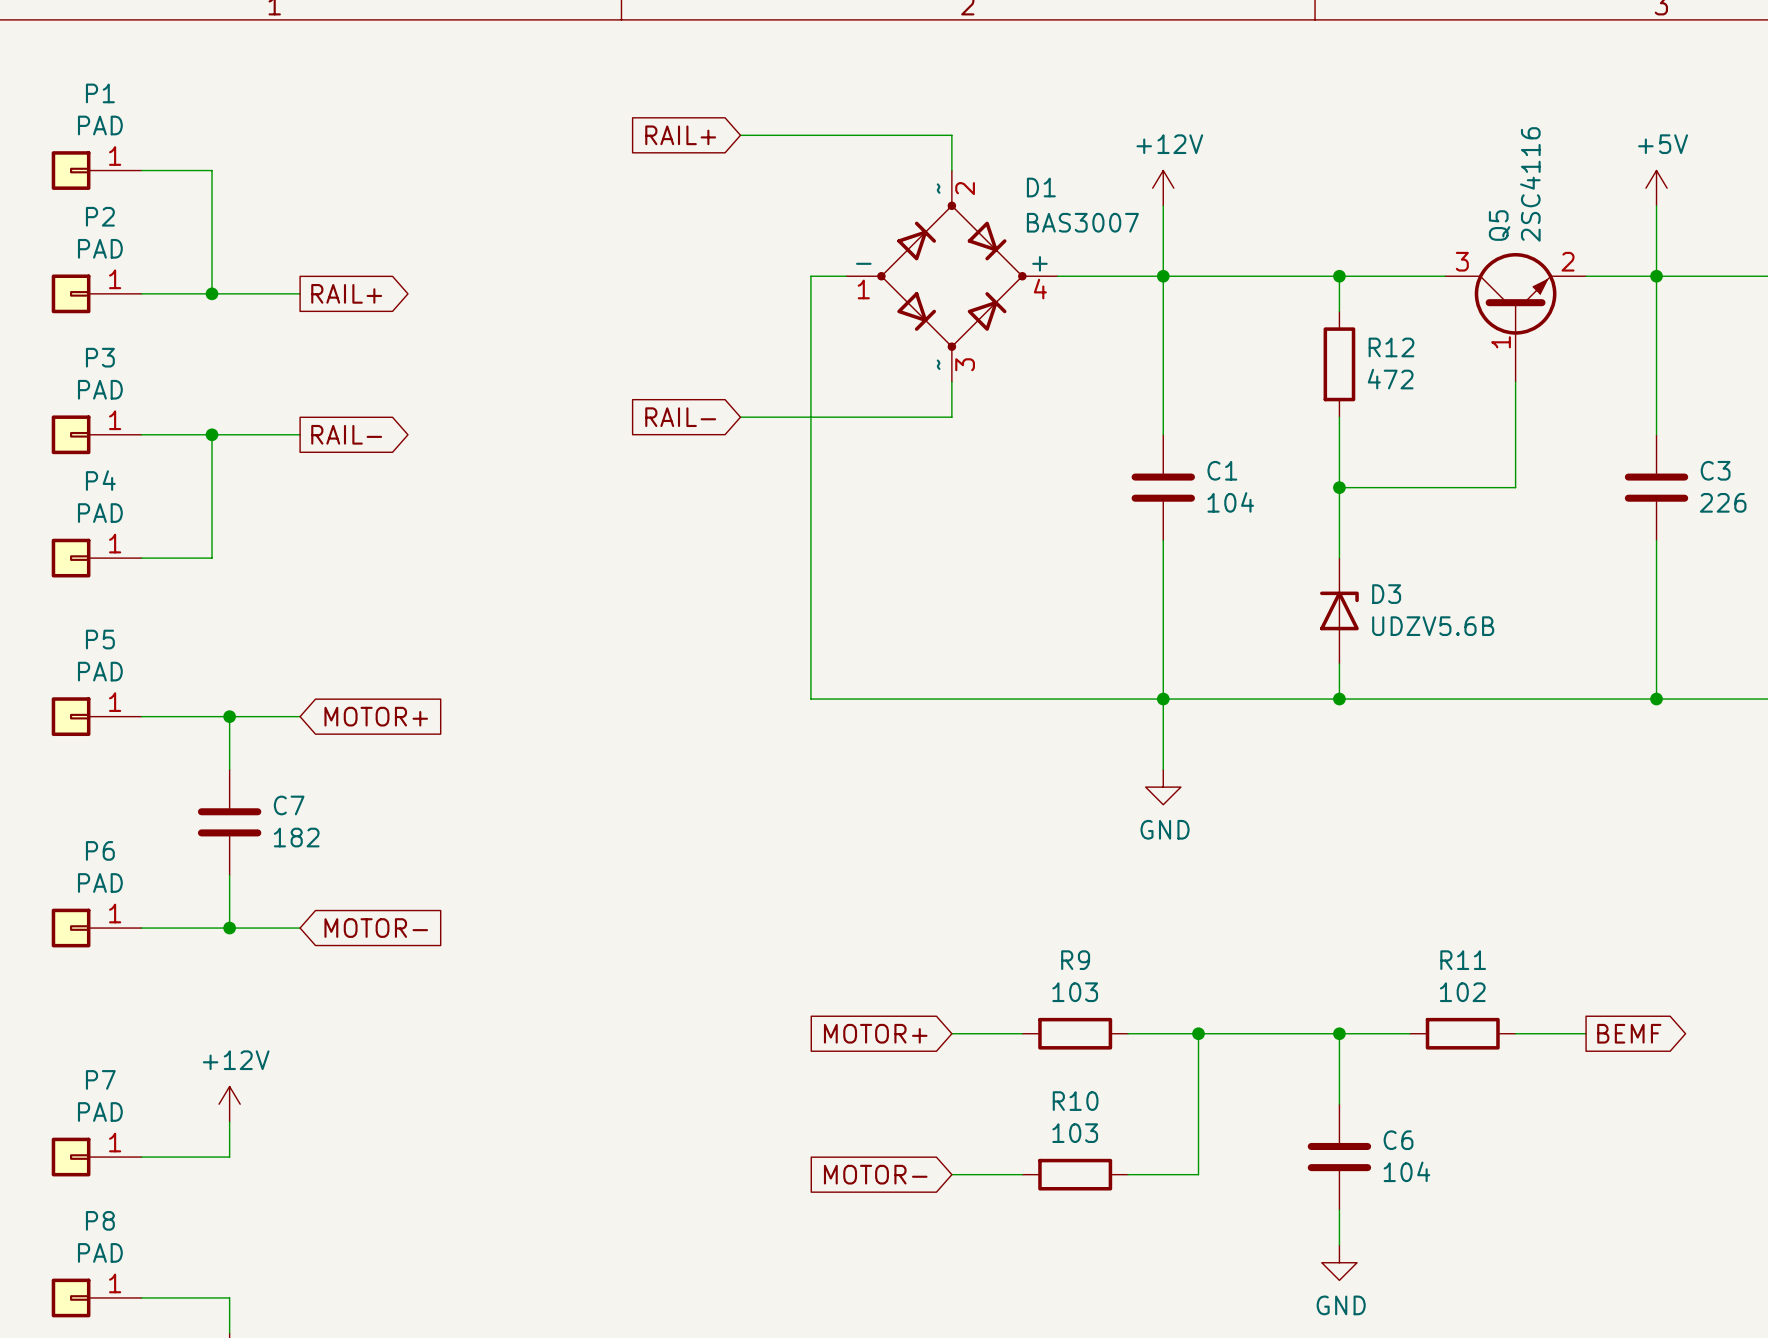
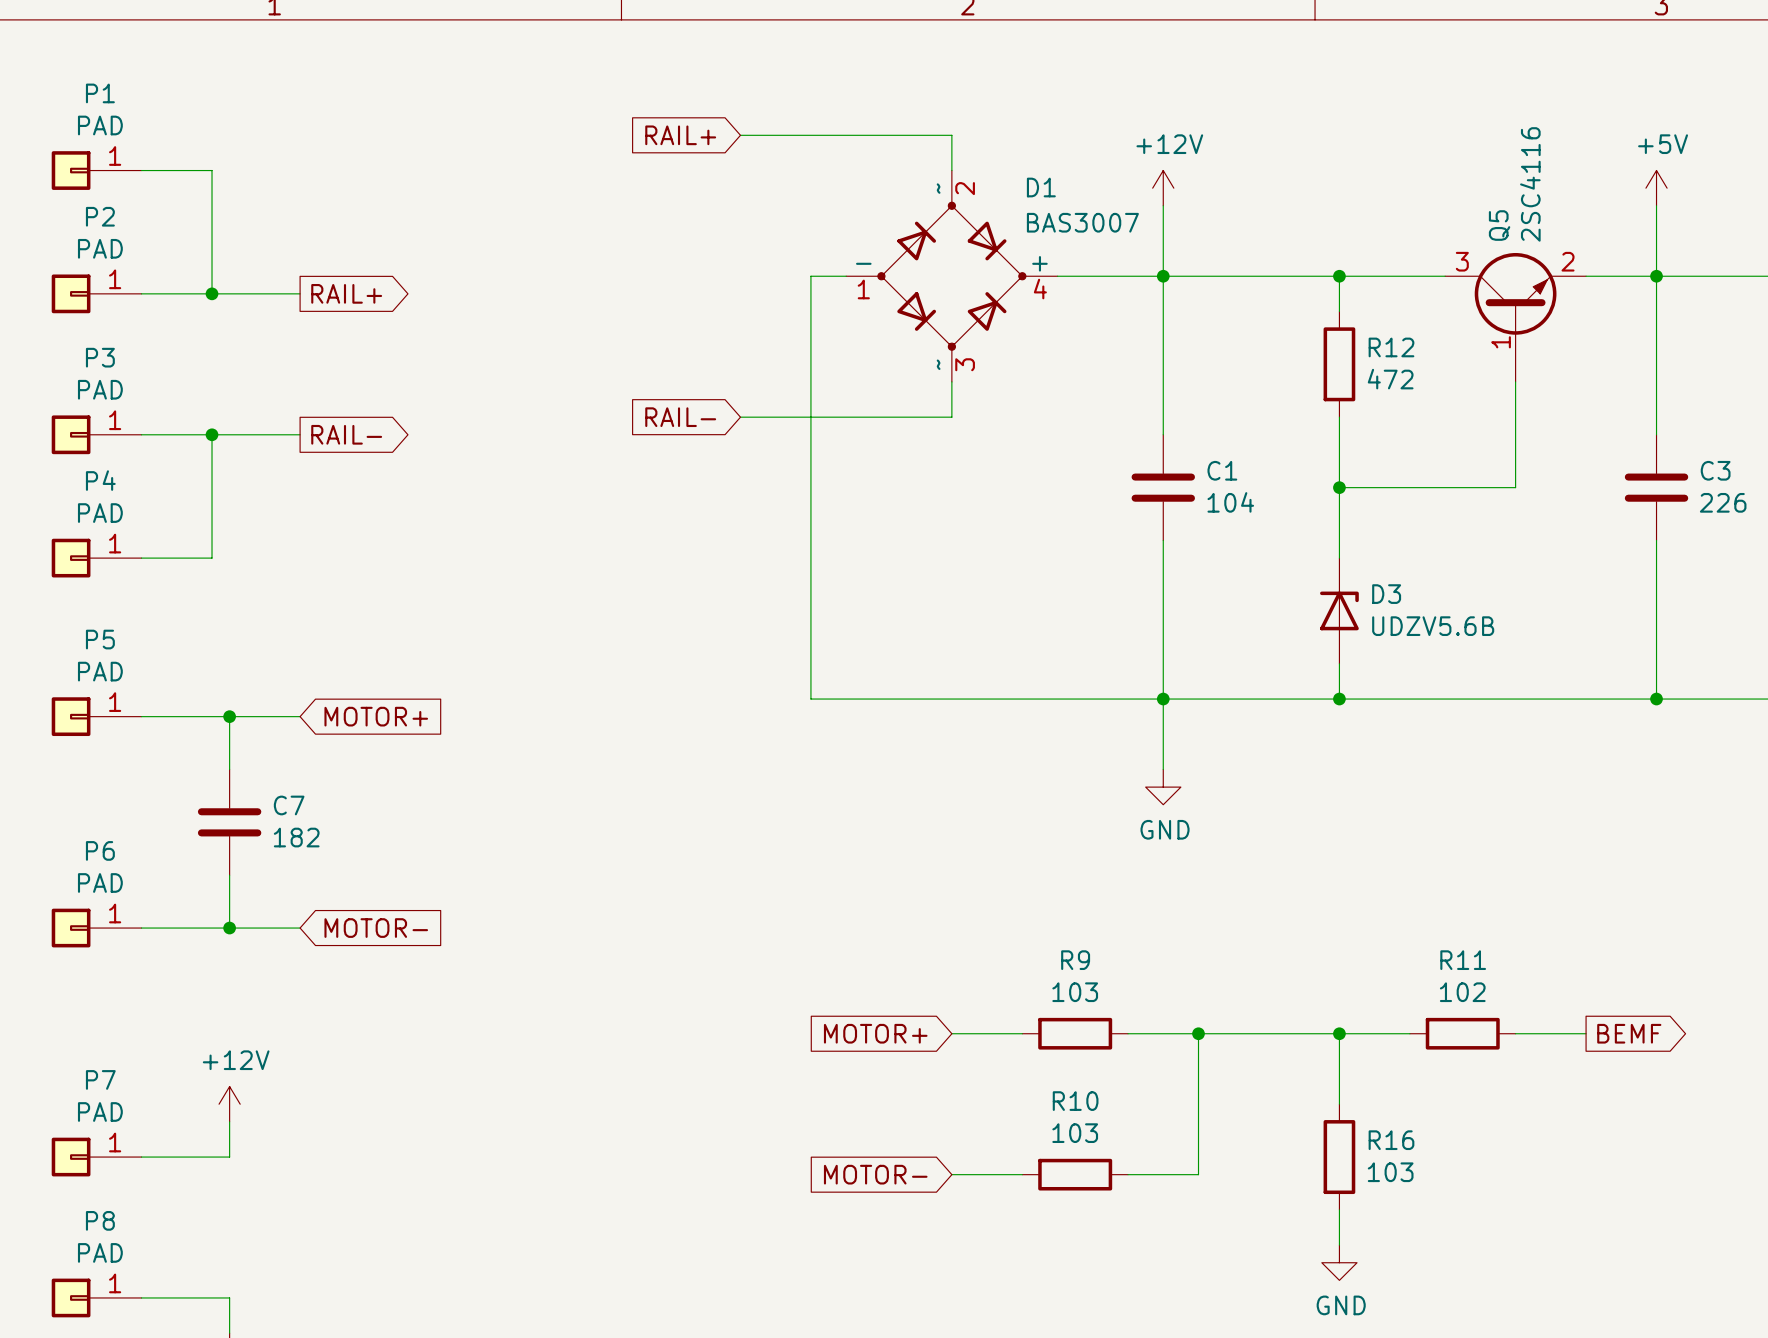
C6: 104 (1339, 1157) -> none
R16: none -> 103 (1339, 1157)

